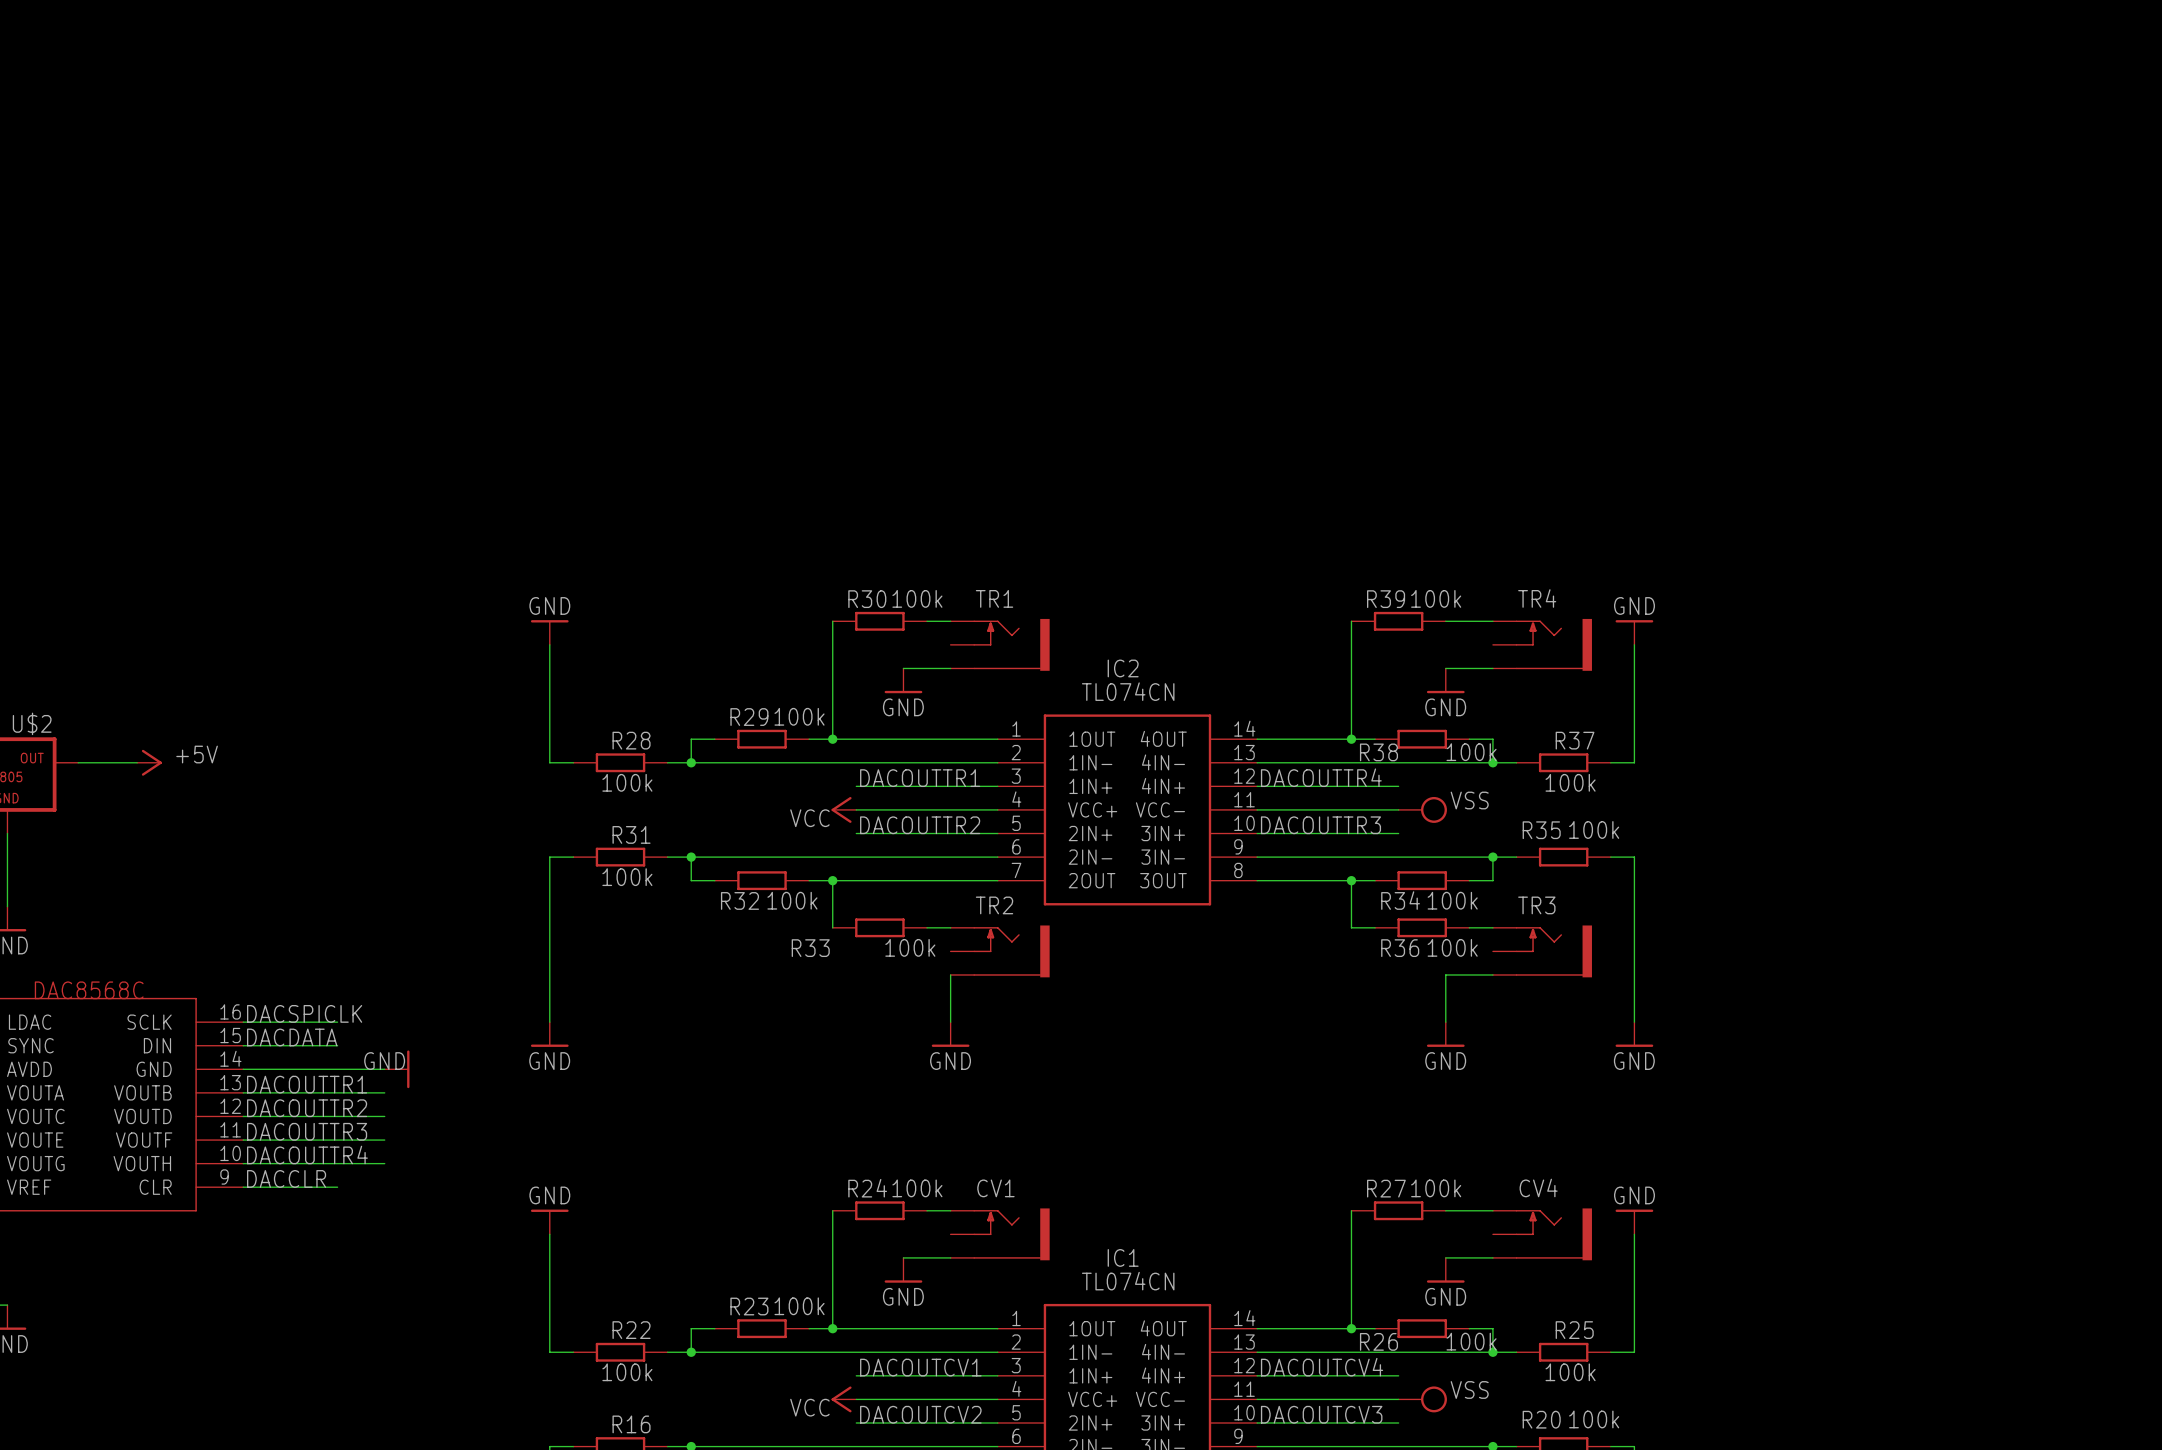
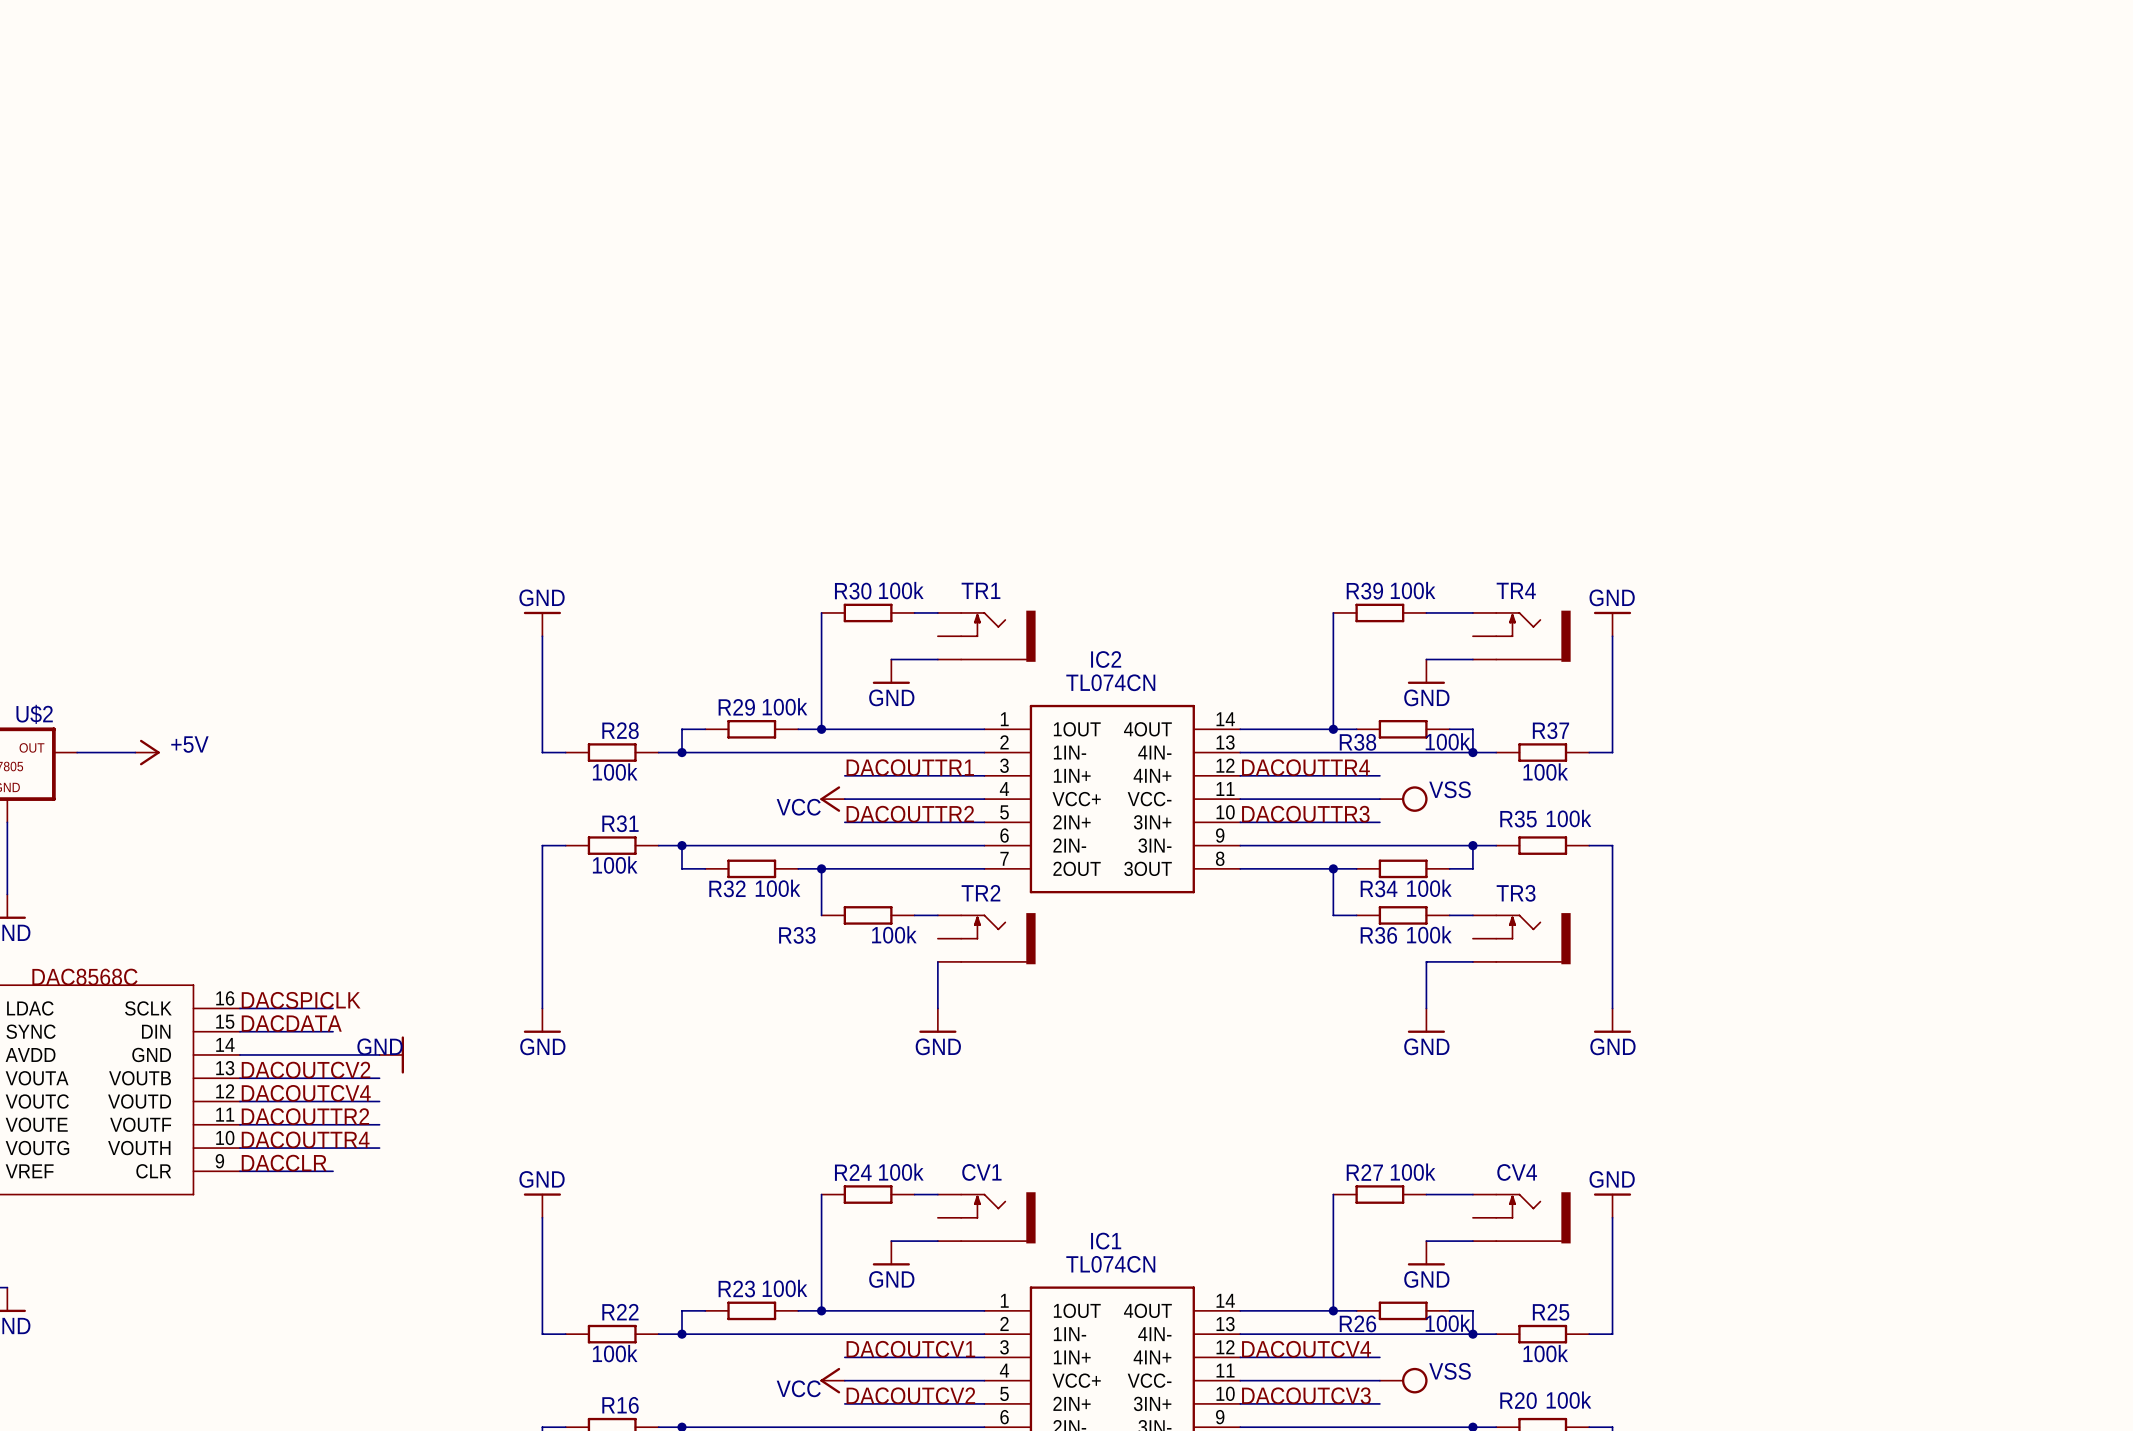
label: DACOUTTR1 (307, 1084) -> DACOUTCV2 (306, 1070)
label: DACOUTTR2 (307, 1108) -> DACOUTCV4 (306, 1093)
label: DACOUTTR3 (307, 1131) -> DACOUTTR2 (305, 1116)

